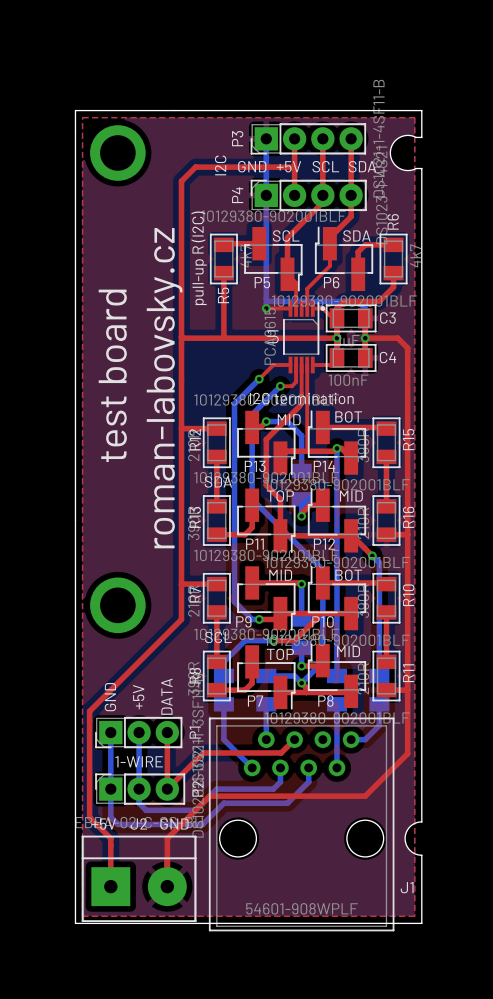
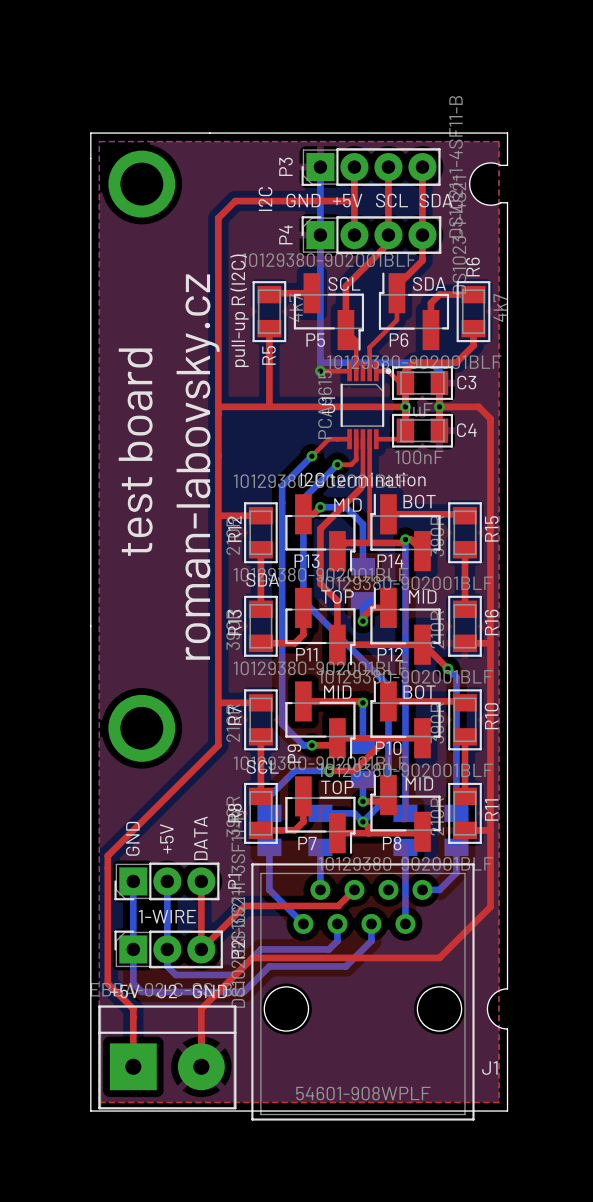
P9 name rotation: 0° (243, 621) -> 90° counterclockwise (294, 753)

